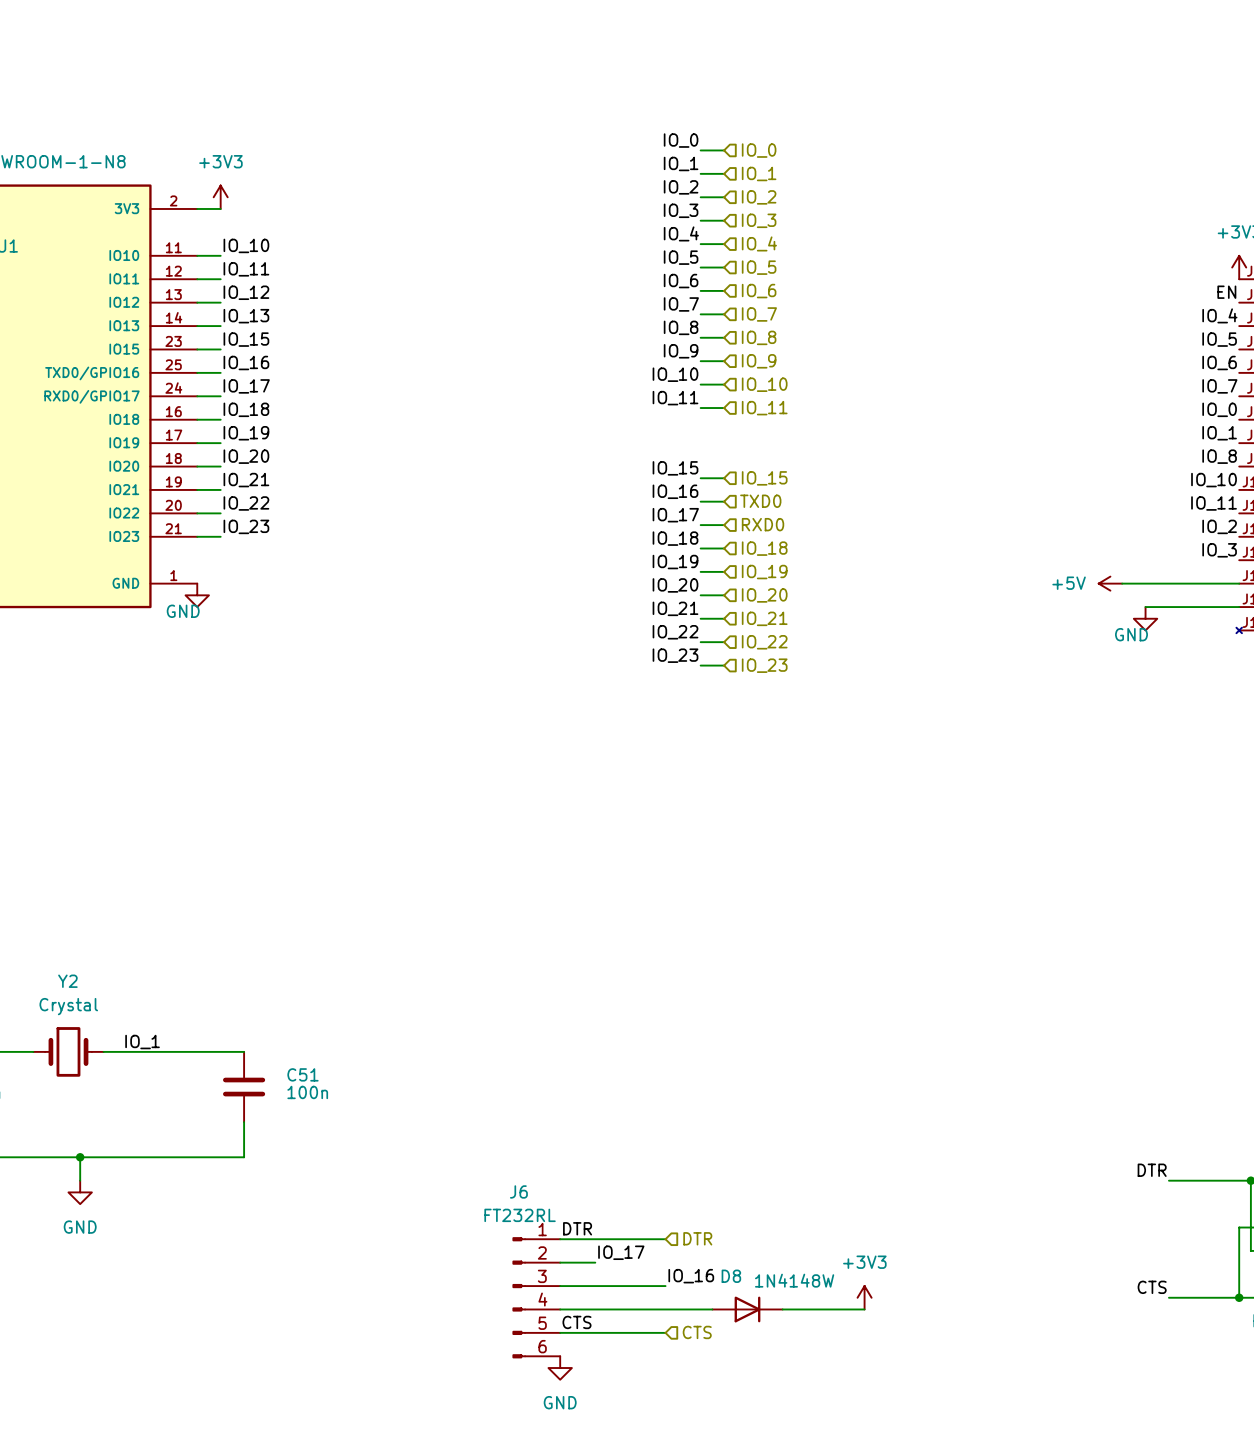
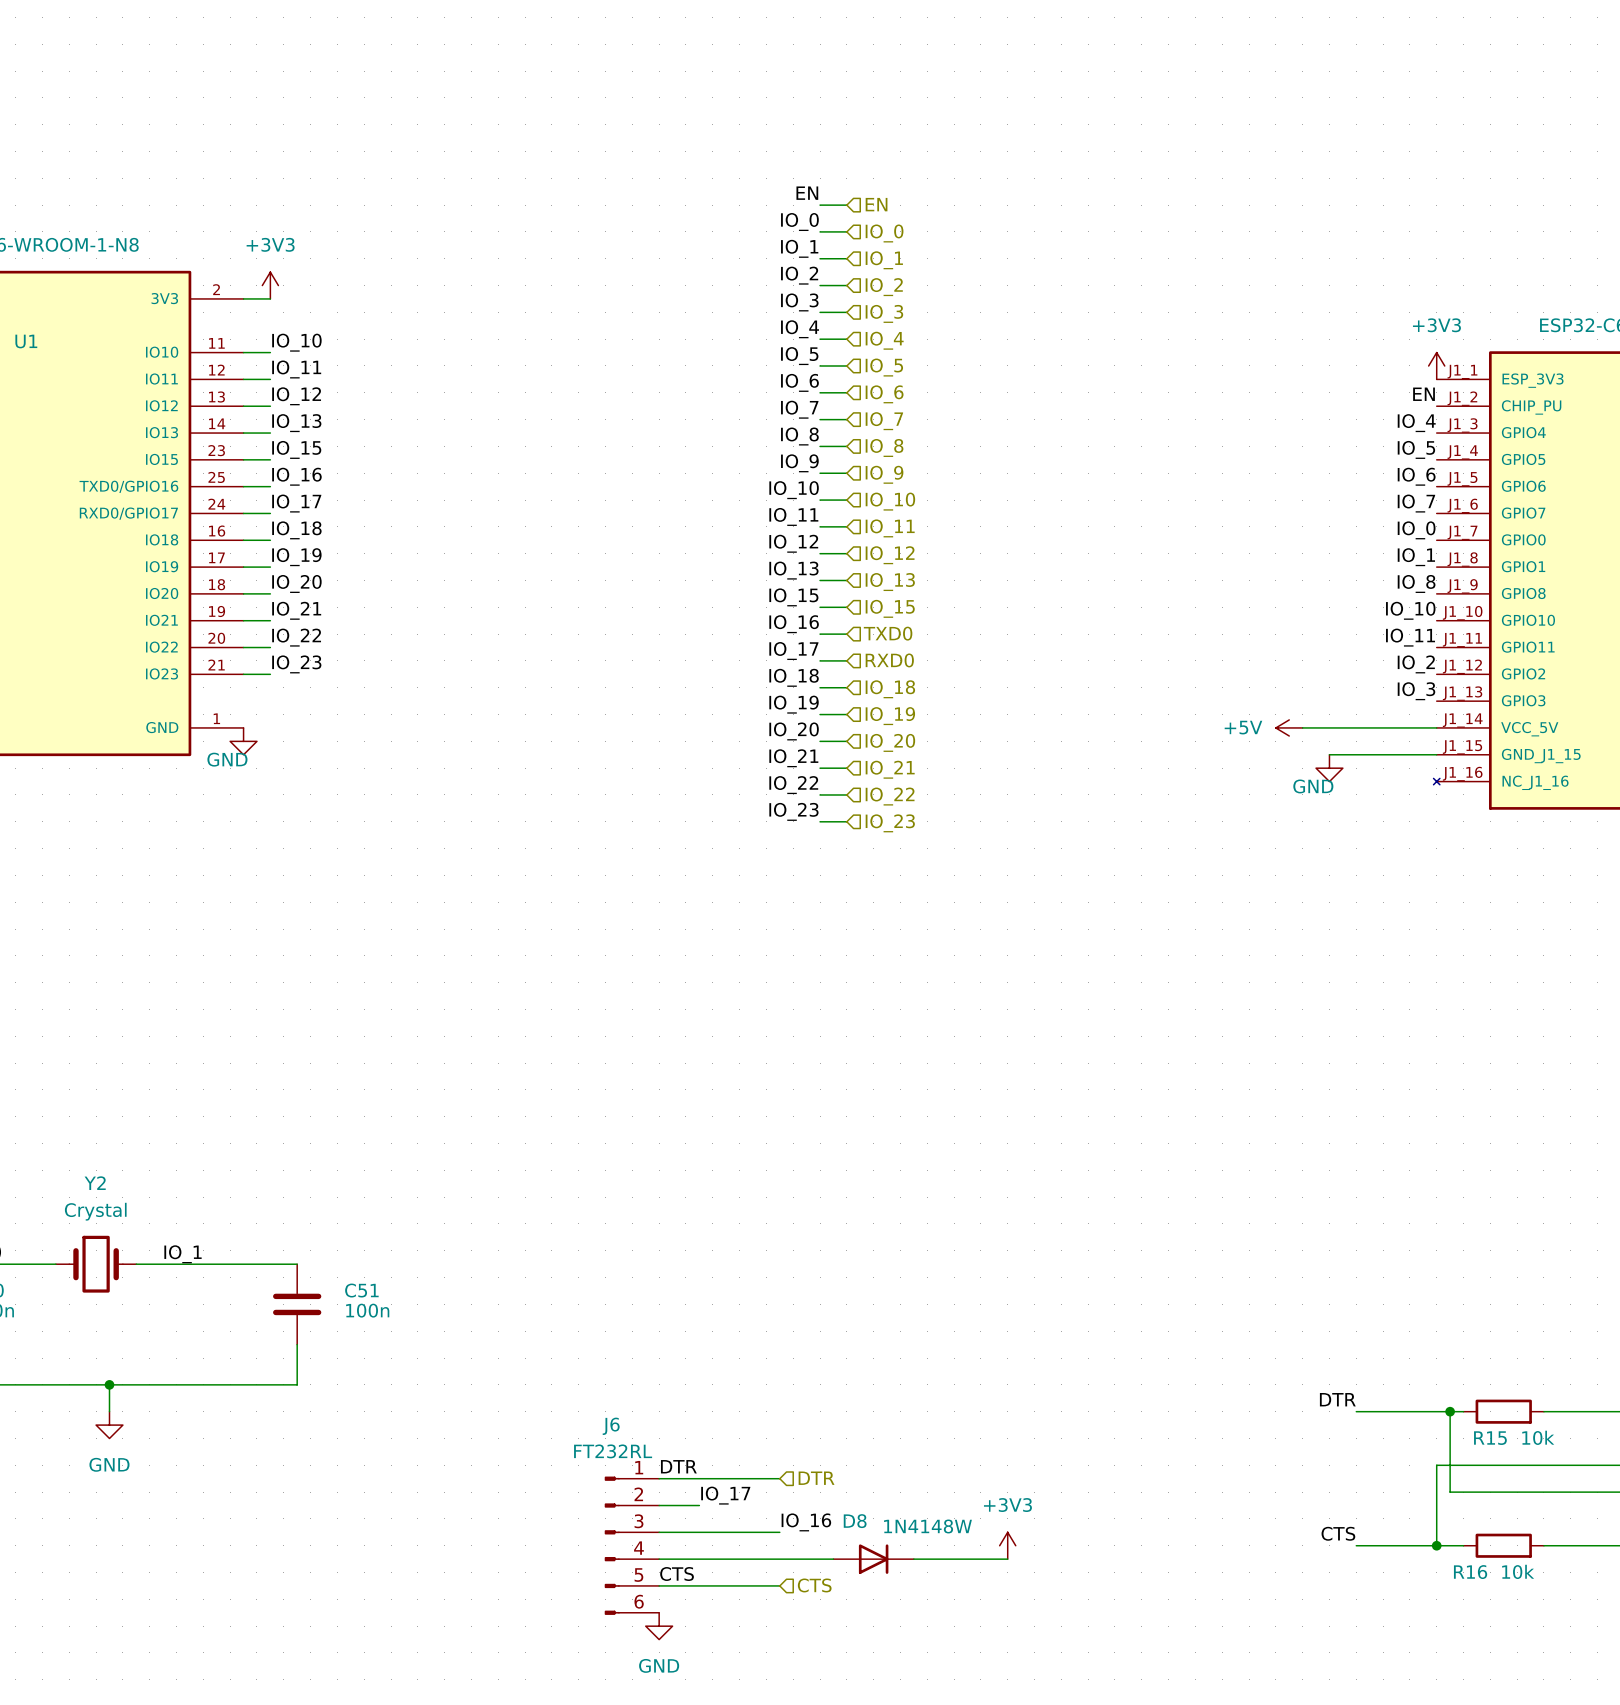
label: none -> EN (807, 193)
hierarchical label: none -> EN (876, 204)
wire: none -> (820, 205) (846, 205)
label: none -> IO_12 (793, 543)
wire: none -> (820, 553) (846, 553)
hierarchical label: none -> IO_12 (890, 555)
label: none -> IO_13 (793, 570)
wire: none -> (820, 580) (846, 580)
hierarchical label: none -> IO_13 (890, 582)

